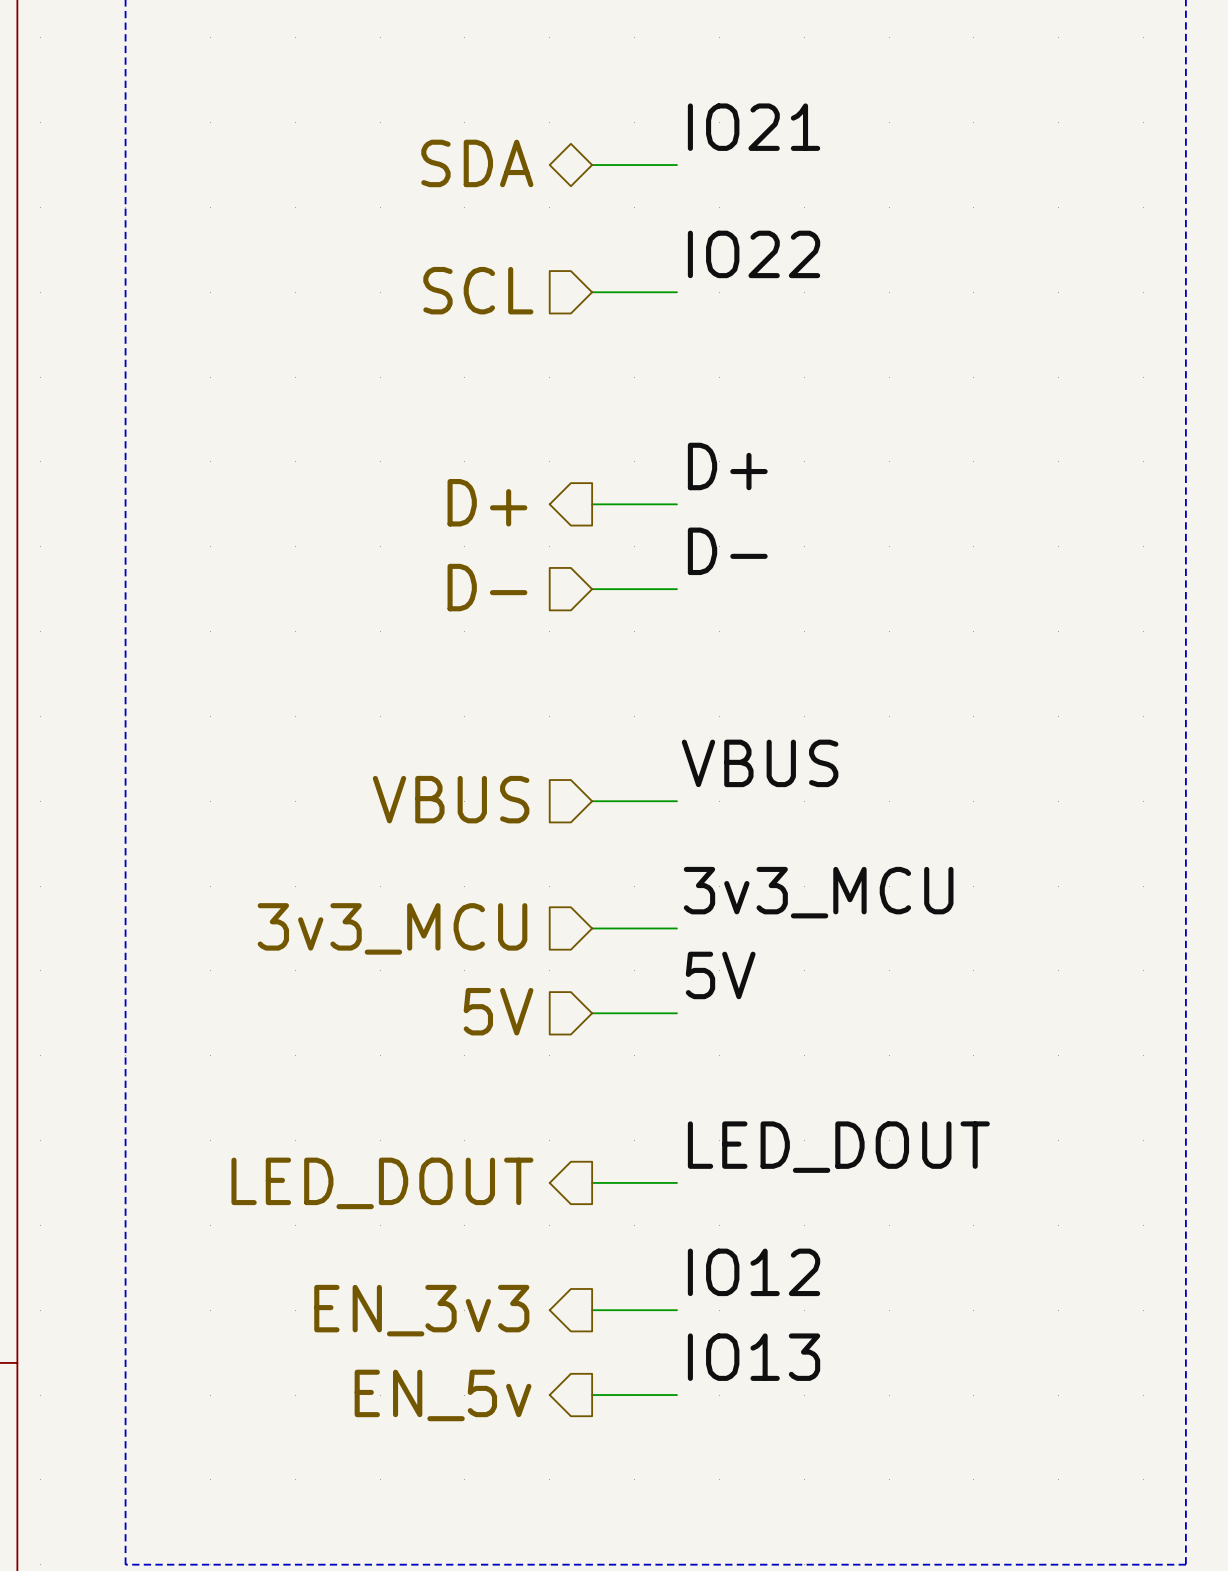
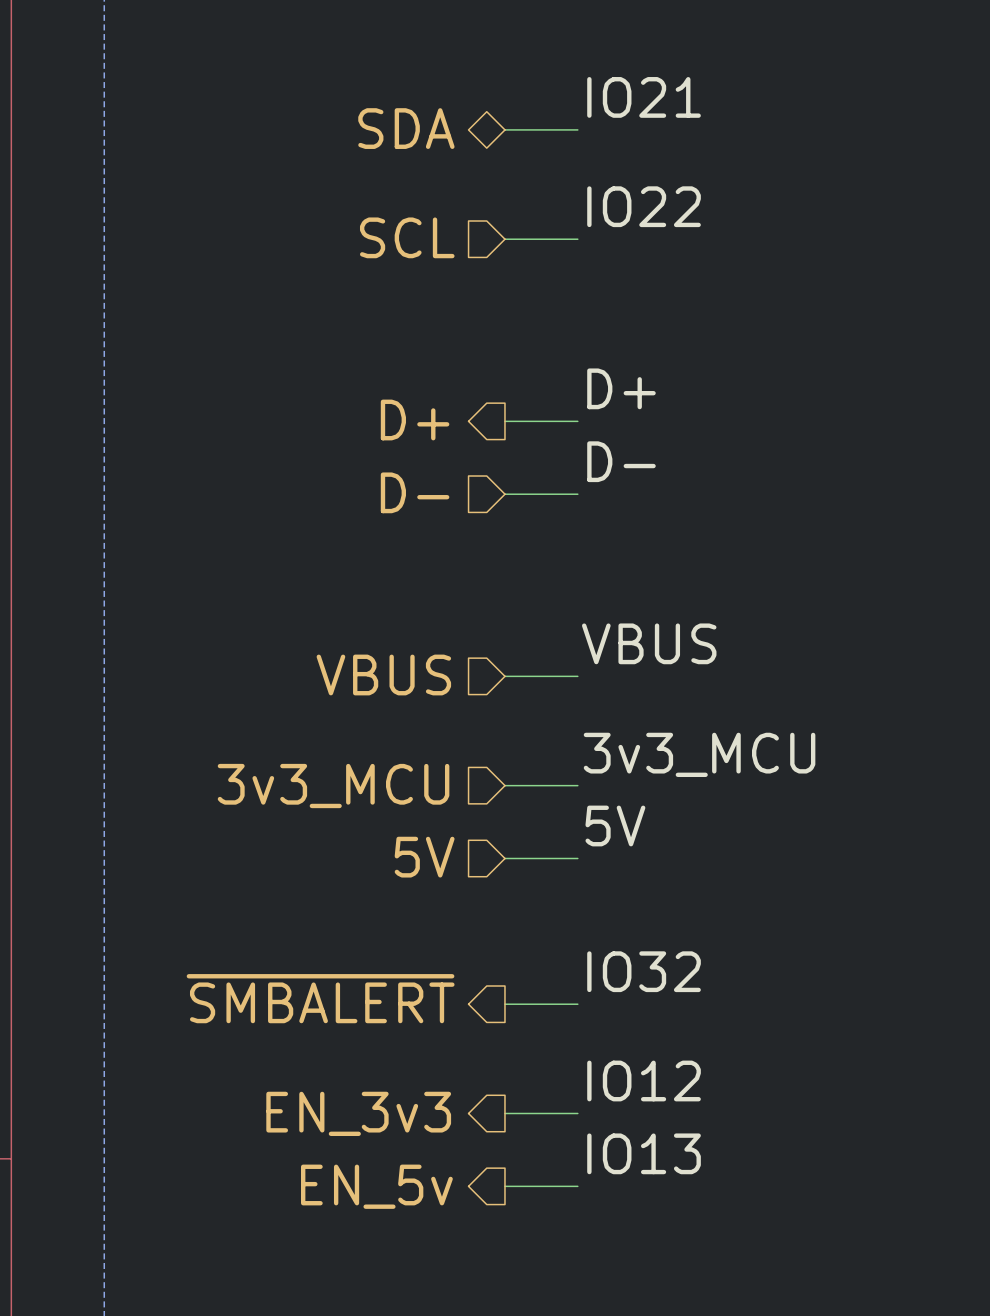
label: LED_DOUT (838, 1147) -> IO32 (644, 971)
hierarchical label: LED_DOUT (382, 1183) -> ~{SMBALERT} (320, 998)

